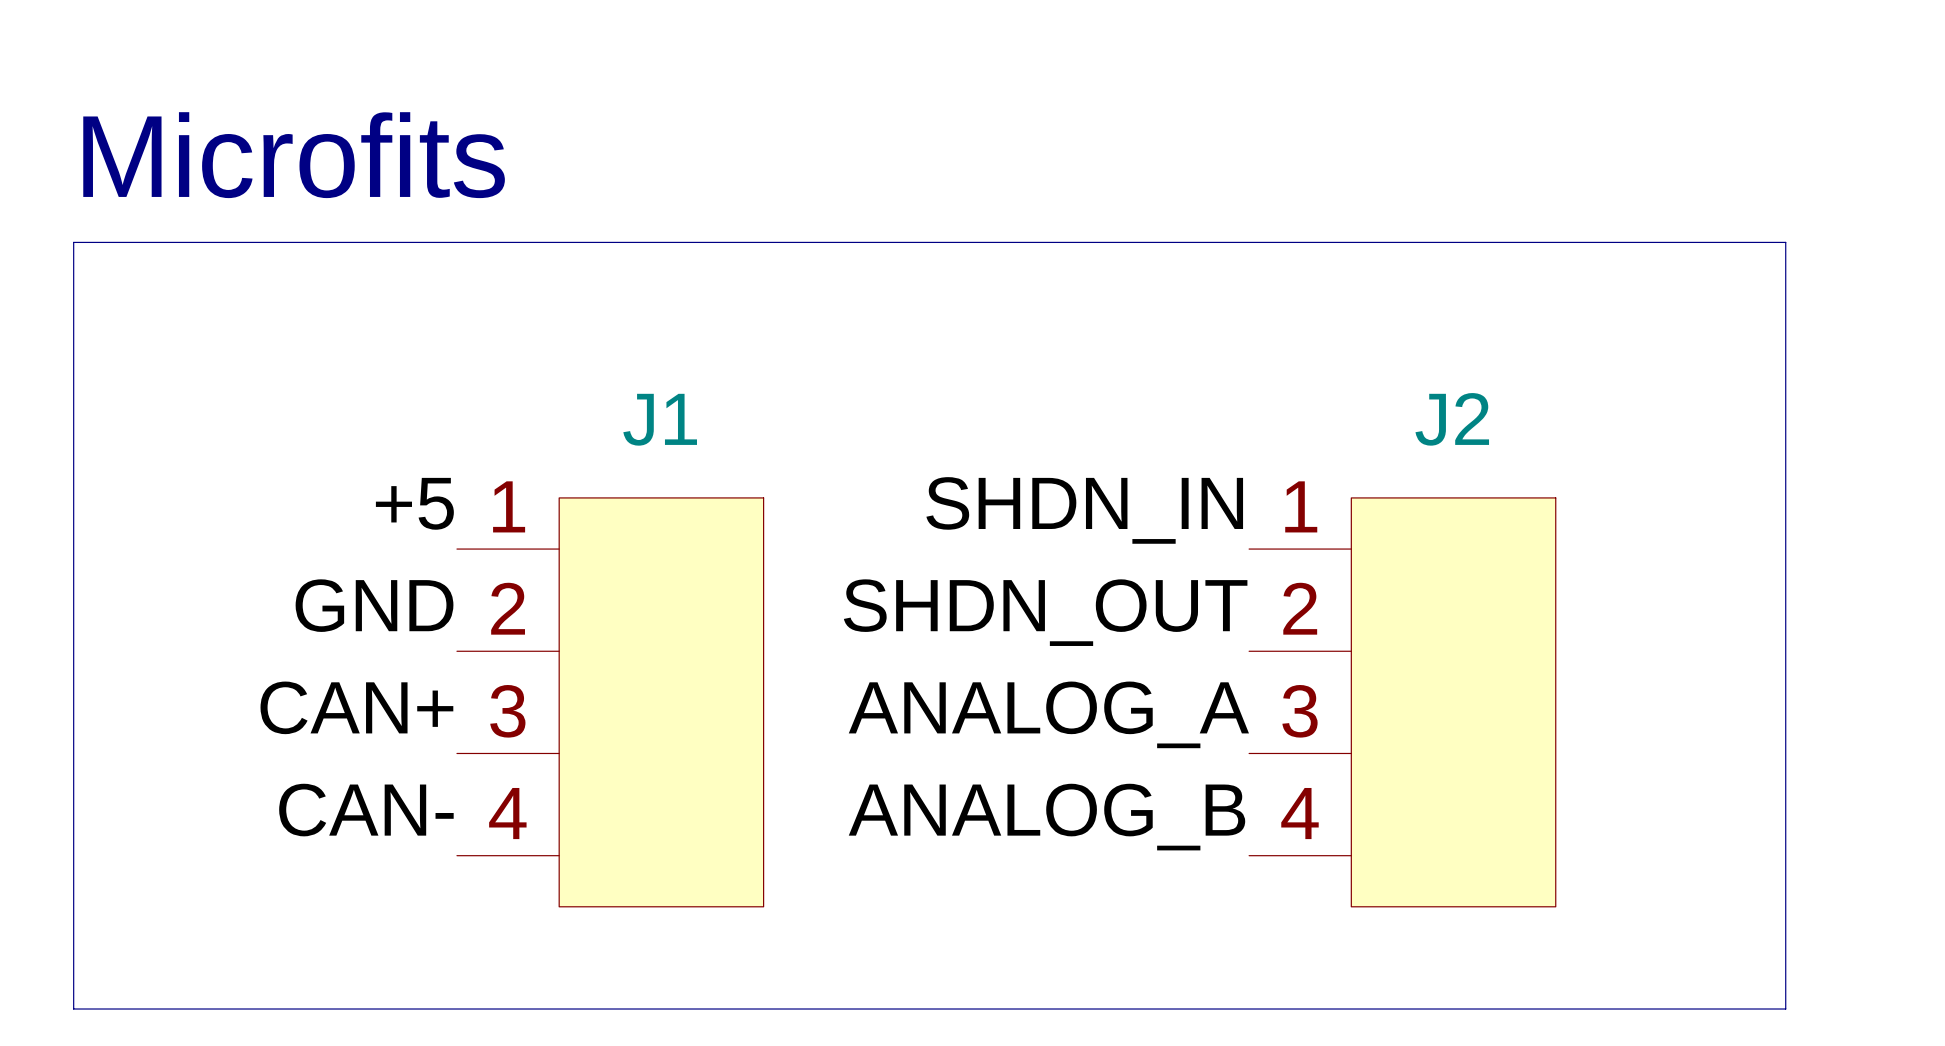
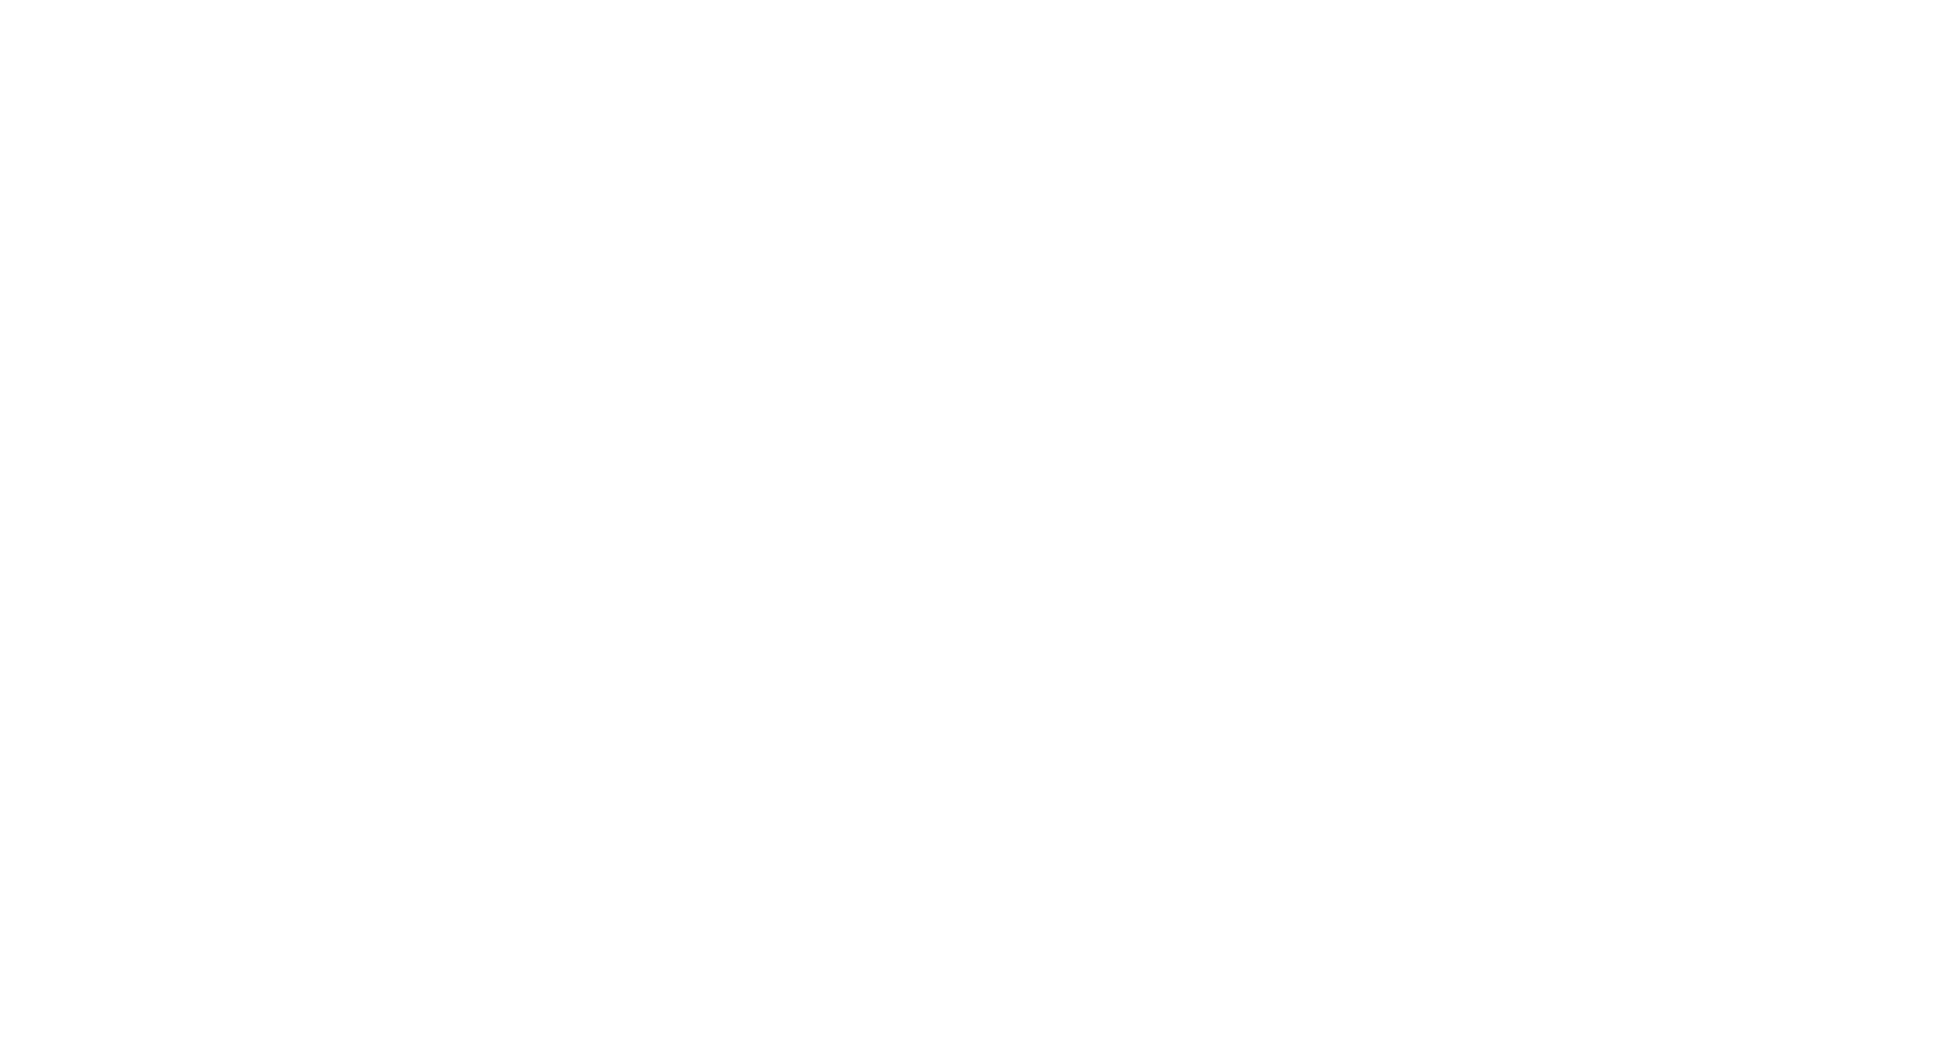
text: Microfits (294, 155) -> none
line: (73, 242) (1785, 242) (1785, 1009) (73, 1009) (73, 242) -> none
label: +5 (414, 503) -> none
label: SHDN_IN (1084, 510) -> none
label: GND (374, 605) -> none
label: SHDN_OUT (1045, 612) -> none
J1: (610, 702) -> none
J2: (1402, 702) -> none
label: CAN+ (356, 707) -> none
label: ANALOG_A (1048, 714) -> none
label: CAN- (366, 810) -> none
label: ANALOG_B (1046, 817) -> none

